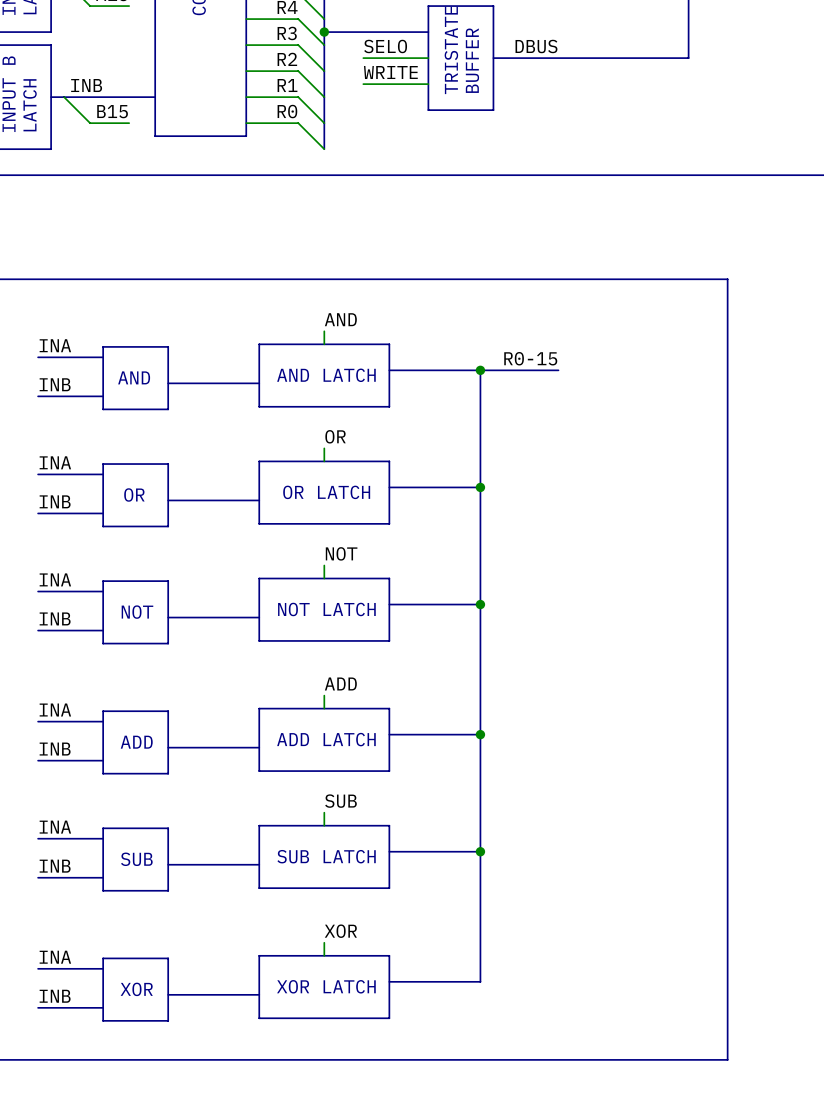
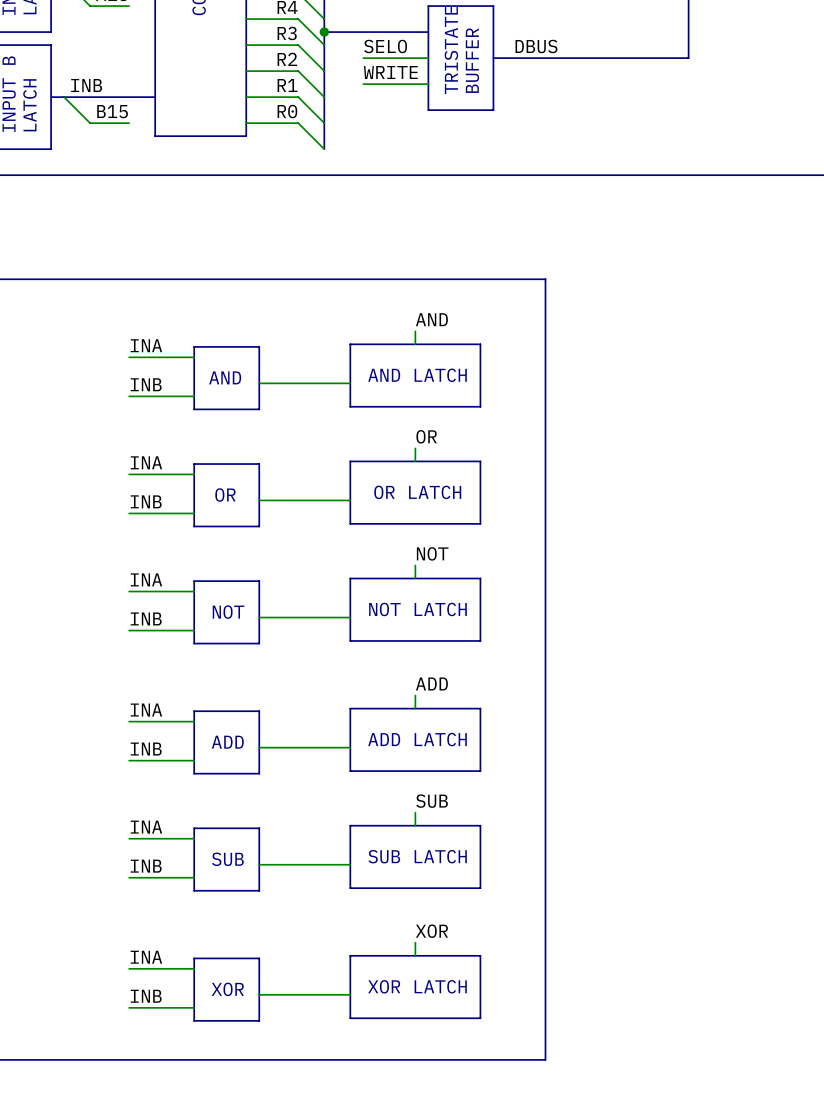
line: (545, 279) (727, 279) (727, 1059) (545, 1059) -> (545, 279) (545, 1059)
label position: AND (340, 319) -> AND (431, 319)
wire: (324, 331) (324, 344) -> (415, 331) (415, 344)
line: (350, 344) (259, 344) (259, 346) -> (350, 344) (350, 406)
line: (389, 344) (389, 406) -> (389, 344) (480, 344) (480, 406) (389, 406)
label: INA (55, 345) -> none
label: none -> INA (146, 345)
line: (103, 346) (103, 409) (168, 409) (168, 346) (103, 346) -> none
bus: (38, 357) (103, 357) -> none
wire: none -> (129, 357) (194, 357)
label: R0-15 (530, 358) -> none
bus: (389, 370) (558, 370) -> none
bus: (480, 370) (480, 981) (389, 981) -> none
junction: (480, 370) -> none
text position: AND LATCH (326, 375) -> AND LATCH (417, 375)
text position: AND (134, 377) -> AND (225, 377)
bus: (168, 383) (259, 383) -> none
wire: none -> (259, 383) (350, 383)
label: INB (55, 384) -> none
label: none -> INB (146, 384)
bus: (38, 396) (103, 396) -> none
wire: none -> (129, 396) (194, 396)
line: (259, 406) (350, 406) -> (259, 406) (259, 409) (194, 409) (194, 346) (259, 346)
label position: OR (335, 436) -> OR (426, 436)
wire: (324, 448) (324, 461) -> (415, 448) (415, 461)
line: (350, 461) (259, 461) (259, 464) -> (350, 461) (350, 523)
line: (389, 461) (389, 523) -> (389, 461) (480, 461) (480, 523) (389, 523)
label: INA (55, 462) -> none
label: none -> INA (146, 462)
line: (103, 464) (103, 526) (168, 526) (168, 464) (103, 464) -> none
bus: (38, 474) (103, 474) -> none
wire: none -> (129, 474) (194, 474)
bus: (389, 487) (480, 487) -> none
junction: (480, 487) -> none
text position: OR LATCH (326, 492) -> OR LATCH (417, 492)
text position: OR (134, 494) -> OR (225, 494)
bus: (168, 500) (259, 500) -> none
wire: none -> (259, 500) (350, 500)
label: INB (55, 501) -> none
label: none -> INB (146, 501)
bus: (38, 513) (103, 513) -> none
wire: none -> (129, 513) (194, 513)
line: (259, 523) (350, 523) -> (259, 523) (259, 526) (194, 526) (194, 464) (259, 464)
label position: NOT (341, 553) -> NOT (432, 553)
wire: (324, 565) (324, 578) -> (415, 565) (415, 578)
line: (350, 578) (259, 578) (259, 581) -> (350, 578) (350, 640)
line: (389, 578) (389, 640) -> (389, 578) (480, 578) (480, 640) (389, 640)
label: INA (55, 579) -> none
label: none -> INA (146, 579)
line: (103, 581) (168, 581) (168, 643) (103, 643) (103, 581) -> none
bus: (38, 591) (103, 591) -> none
wire: none -> (129, 591) (194, 591)
bus: (389, 604) (480, 604) -> none
junction: (480, 604) -> none
text position: NOT LATCH (326, 609) -> NOT LATCH (417, 609)
text position: NOT (137, 612) -> NOT (228, 612)
bus: (168, 617) (259, 617) -> none
wire: none -> (259, 617) (350, 617)
label: INB (55, 618) -> none
label: none -> INB (146, 618)
bus: (38, 630) (103, 630) -> none
wire: none -> (129, 630) (194, 630)
line: (259, 640) (350, 640) -> (259, 640) (259, 643) (194, 643) (194, 581) (259, 581)
label position: ADD (340, 683) -> ADD (431, 683)
wire: (324, 695) (324, 708) -> (415, 695) (415, 708)
line: (350, 708) (259, 708) (259, 711) -> (350, 708) (350, 771)
line: (389, 708) (389, 771) -> (389, 708) (480, 708) (480, 771) (389, 771)
label: INA (55, 710) -> none
label: none -> INA (146, 710)
line: (103, 711) (103, 773) (168, 773) (168, 711) (103, 711) -> none
bus: (38, 721) (103, 721) -> none
wire: none -> (129, 721) (194, 721)
bus: (389, 734) (480, 734) -> none
junction: (480, 734) -> none
text position: ADD LATCH (326, 739) -> ADD LATCH (417, 739)
text position: ADD (136, 742) -> ADD (227, 742)
bus: (168, 747) (259, 747) -> none
wire: none -> (259, 747) (350, 747)
label: INB (55, 749) -> none
label: none -> INB (146, 749)
bus: (38, 760) (103, 760) -> none
wire: none -> (129, 760) (194, 760)
line: (259, 771) (350, 771) -> (259, 771) (259, 773) (194, 773) (194, 711) (259, 711)
label position: SUB (340, 801) -> SUB (432, 801)
wire: (324, 812) (324, 825) -> (415, 812) (415, 825)
line: (350, 825) (259, 825) (259, 828) -> (350, 825) (350, 888)
line: (389, 825) (389, 888) -> (389, 825) (480, 825) (480, 888) (389, 888)
label: INA (55, 827) -> none
label: none -> INA (146, 827)
line: (103, 828) (103, 890) (168, 890) (168, 828) (103, 828) -> none
bus: (38, 838) (103, 838) -> none
wire: none -> (129, 838) (194, 838)
bus: (389, 851) (480, 851) -> none
junction: (480, 851) -> none
text position: SUB LATCH (326, 856) -> SUB LATCH (417, 856)
text position: SUB (136, 859) -> SUB (227, 859)
bus: (168, 864) (259, 864) -> none
wire: none -> (259, 864) (350, 864)
label: INB (55, 866) -> none
label: none -> INB (146, 866)
bus: (38, 877) (103, 877) -> none
wire: none -> (129, 877) (194, 877)
line: (259, 888) (350, 888) -> (259, 888) (259, 890) (194, 890) (194, 828) (259, 828)
label position: XOR (340, 931) -> XOR (431, 931)
wire: (324, 942) (324, 955) -> (415, 942) (415, 955)
line: (350, 955) (259, 955) (259, 958) -> (350, 955) (350, 1018)
line: (389, 955) (389, 1018) -> (389, 955) (480, 955) (480, 1018) (389, 1018)
label: INA (55, 957) -> none
label: none -> INA (146, 957)
line: (103, 958) (103, 1020) (168, 1020) (168, 958) (103, 958) -> none
bus: (38, 968) (103, 968) -> none
wire: none -> (129, 968) (194, 968)
text position: XOR LATCH (326, 986) -> XOR LATCH (417, 986)
text position: XOR (136, 989) -> XOR (227, 989)
bus: (168, 994) (259, 994) -> none
wire: none -> (259, 994) (350, 994)
label: INB (55, 996) -> none
label: none -> INB (146, 996)
bus: (38, 1007) (103, 1007) -> none
wire: none -> (129, 1007) (194, 1007)
line: (259, 1018) (350, 1018) -> (259, 1018) (259, 1020) (194, 1020) (194, 958) (259, 958)

